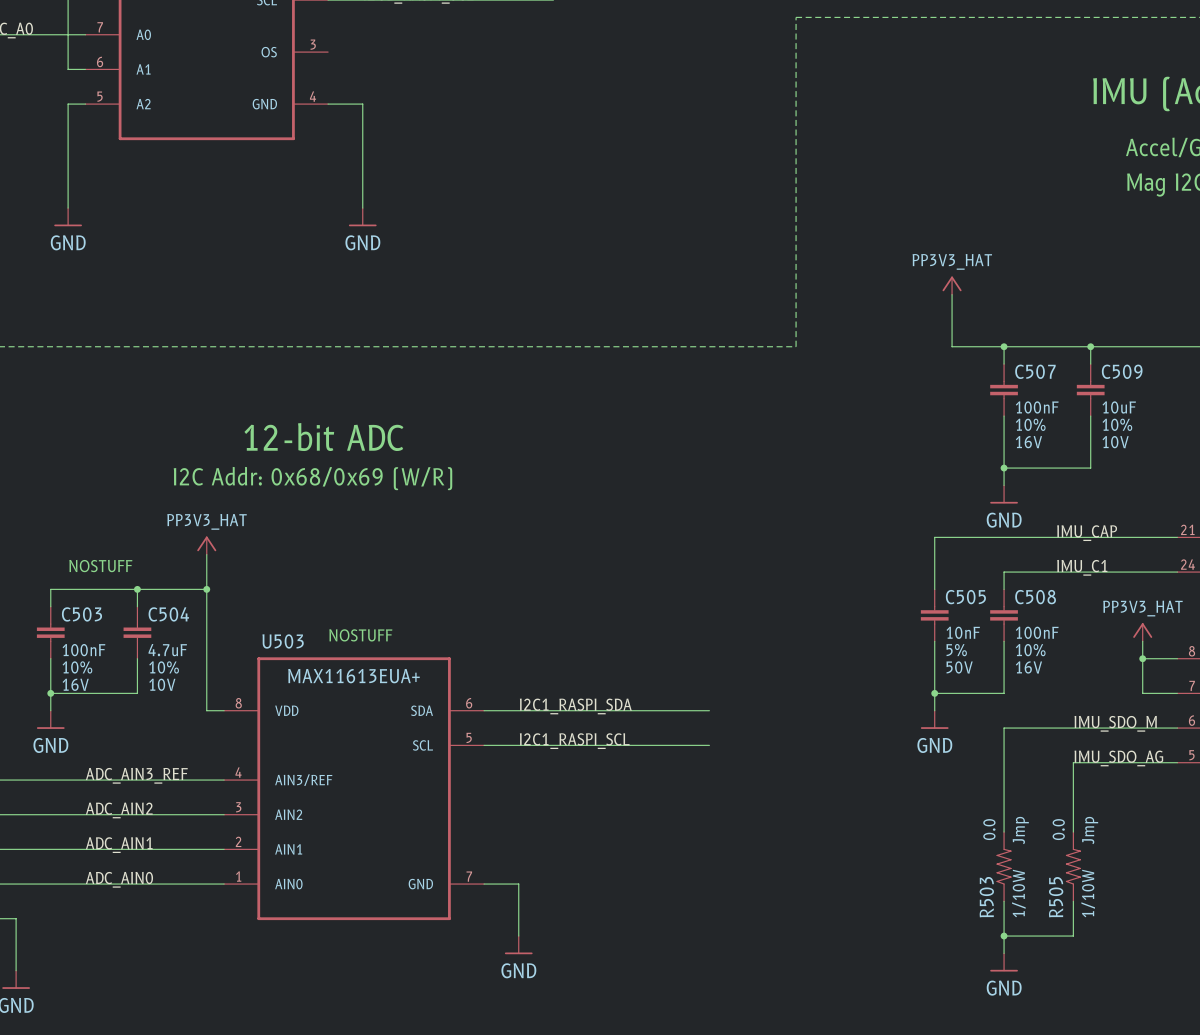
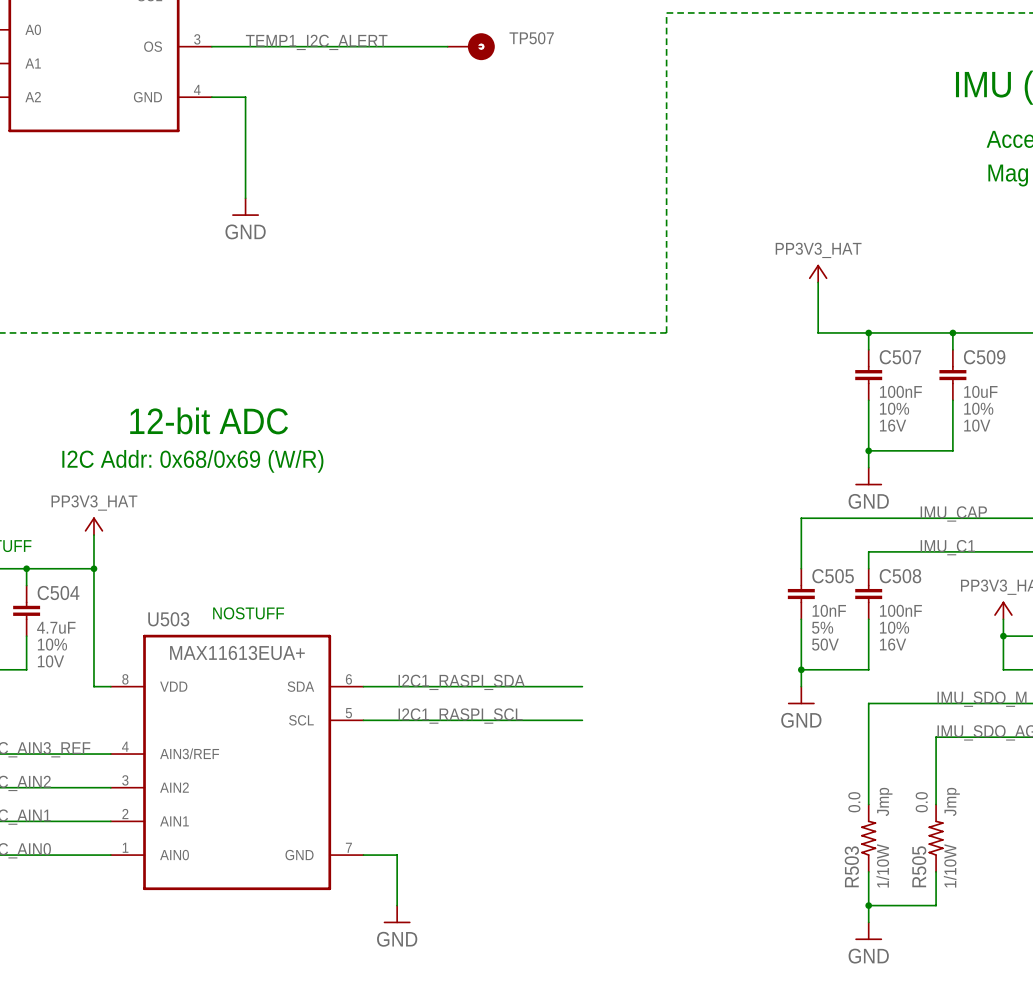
label: none -> TEMP1_I2C_ALERT (316, 42)
wire: none -> (211, 46) (447, 46)
TP507: none -> (471, 46)

